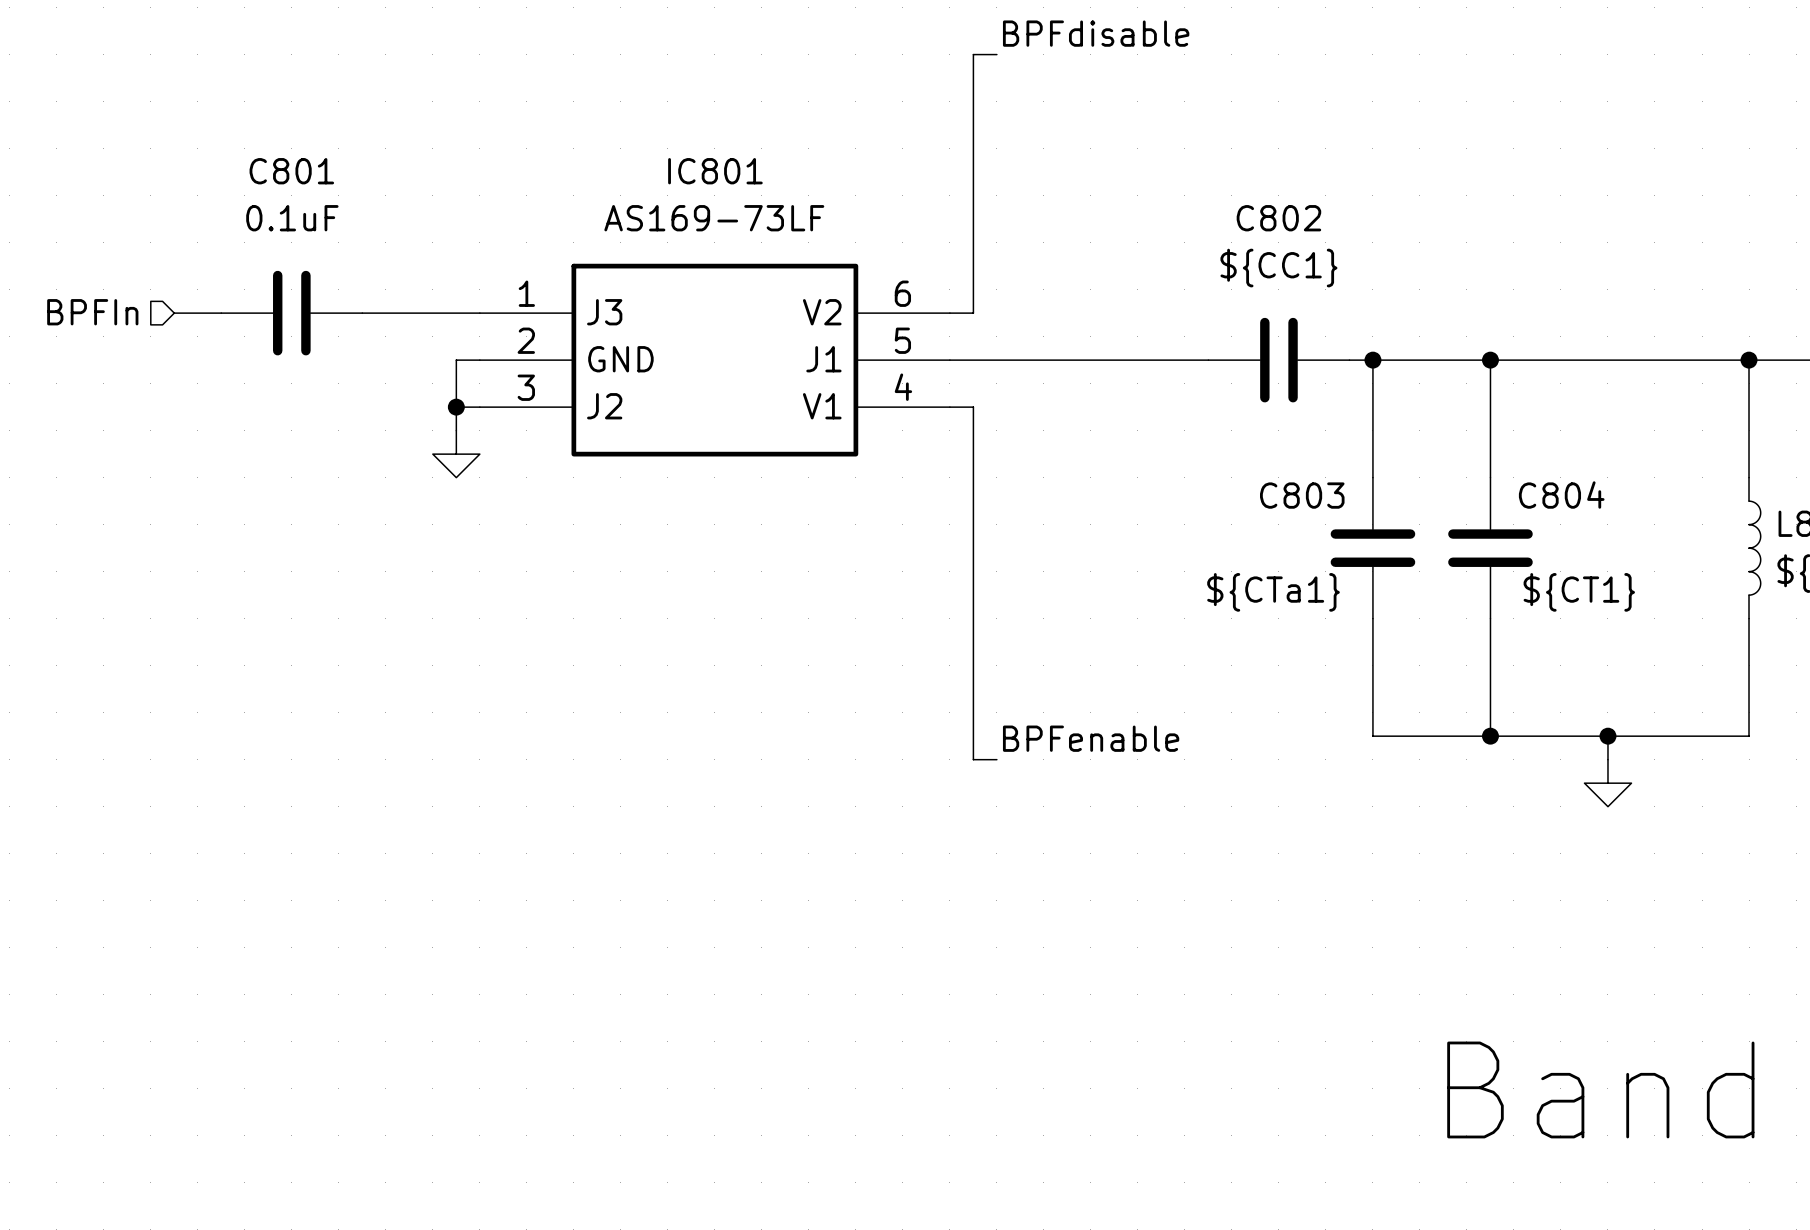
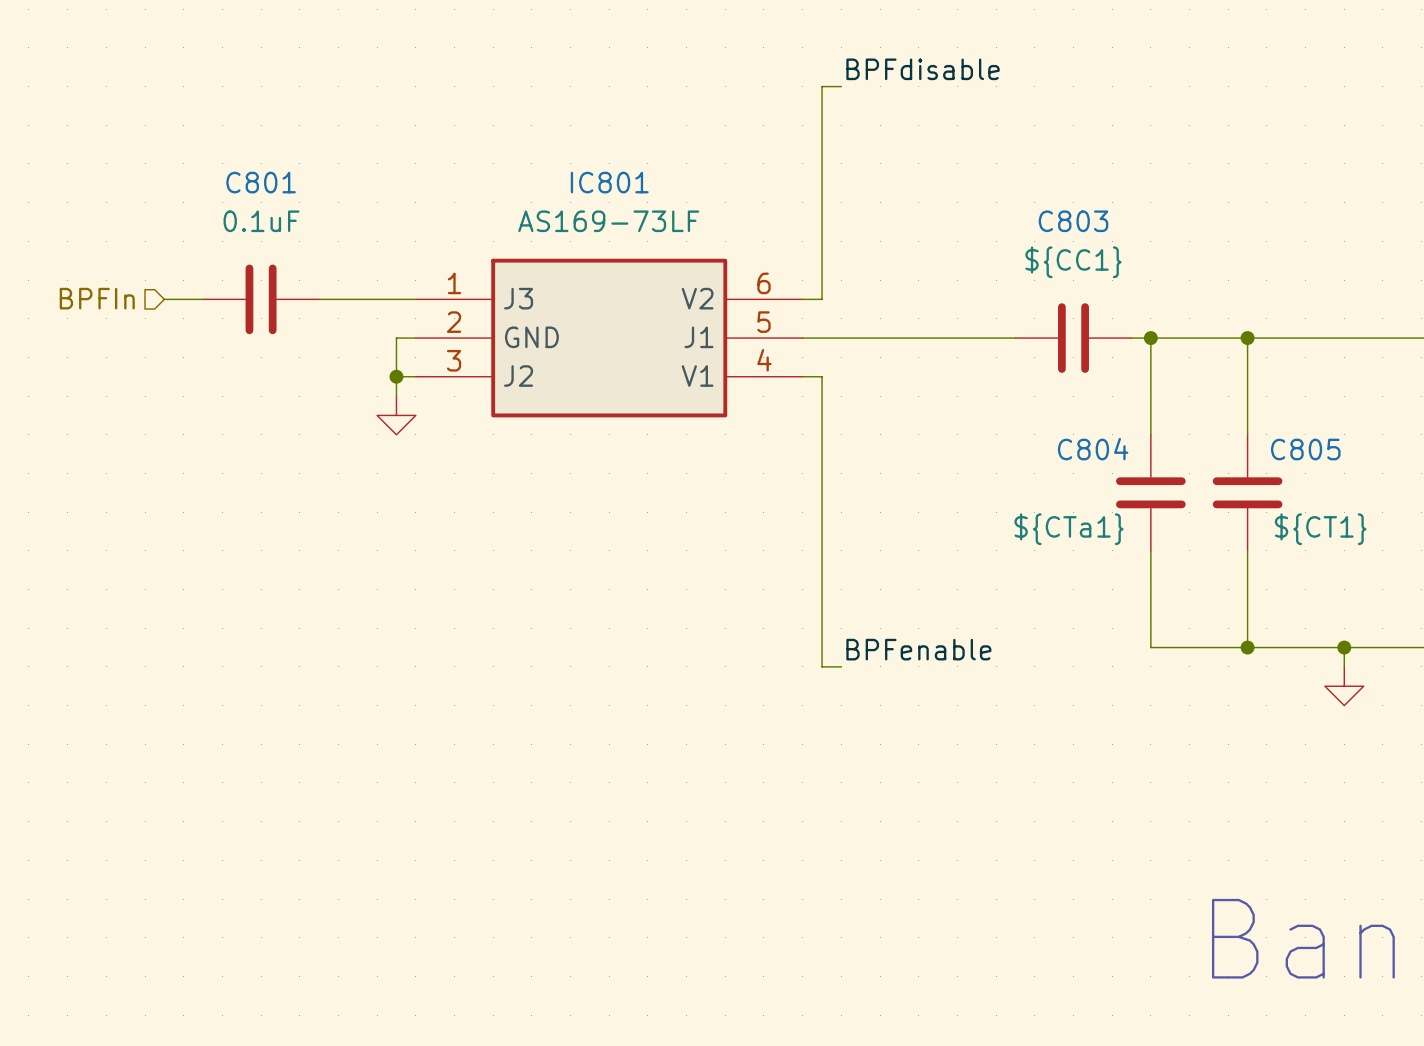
C802 name: C802 (1278, 218) -> C803 (1073, 221)
C803 name: C803 (1302, 495) -> C804 (1093, 449)
C804 name: C804 (1561, 495) -> C805 (1305, 449)

